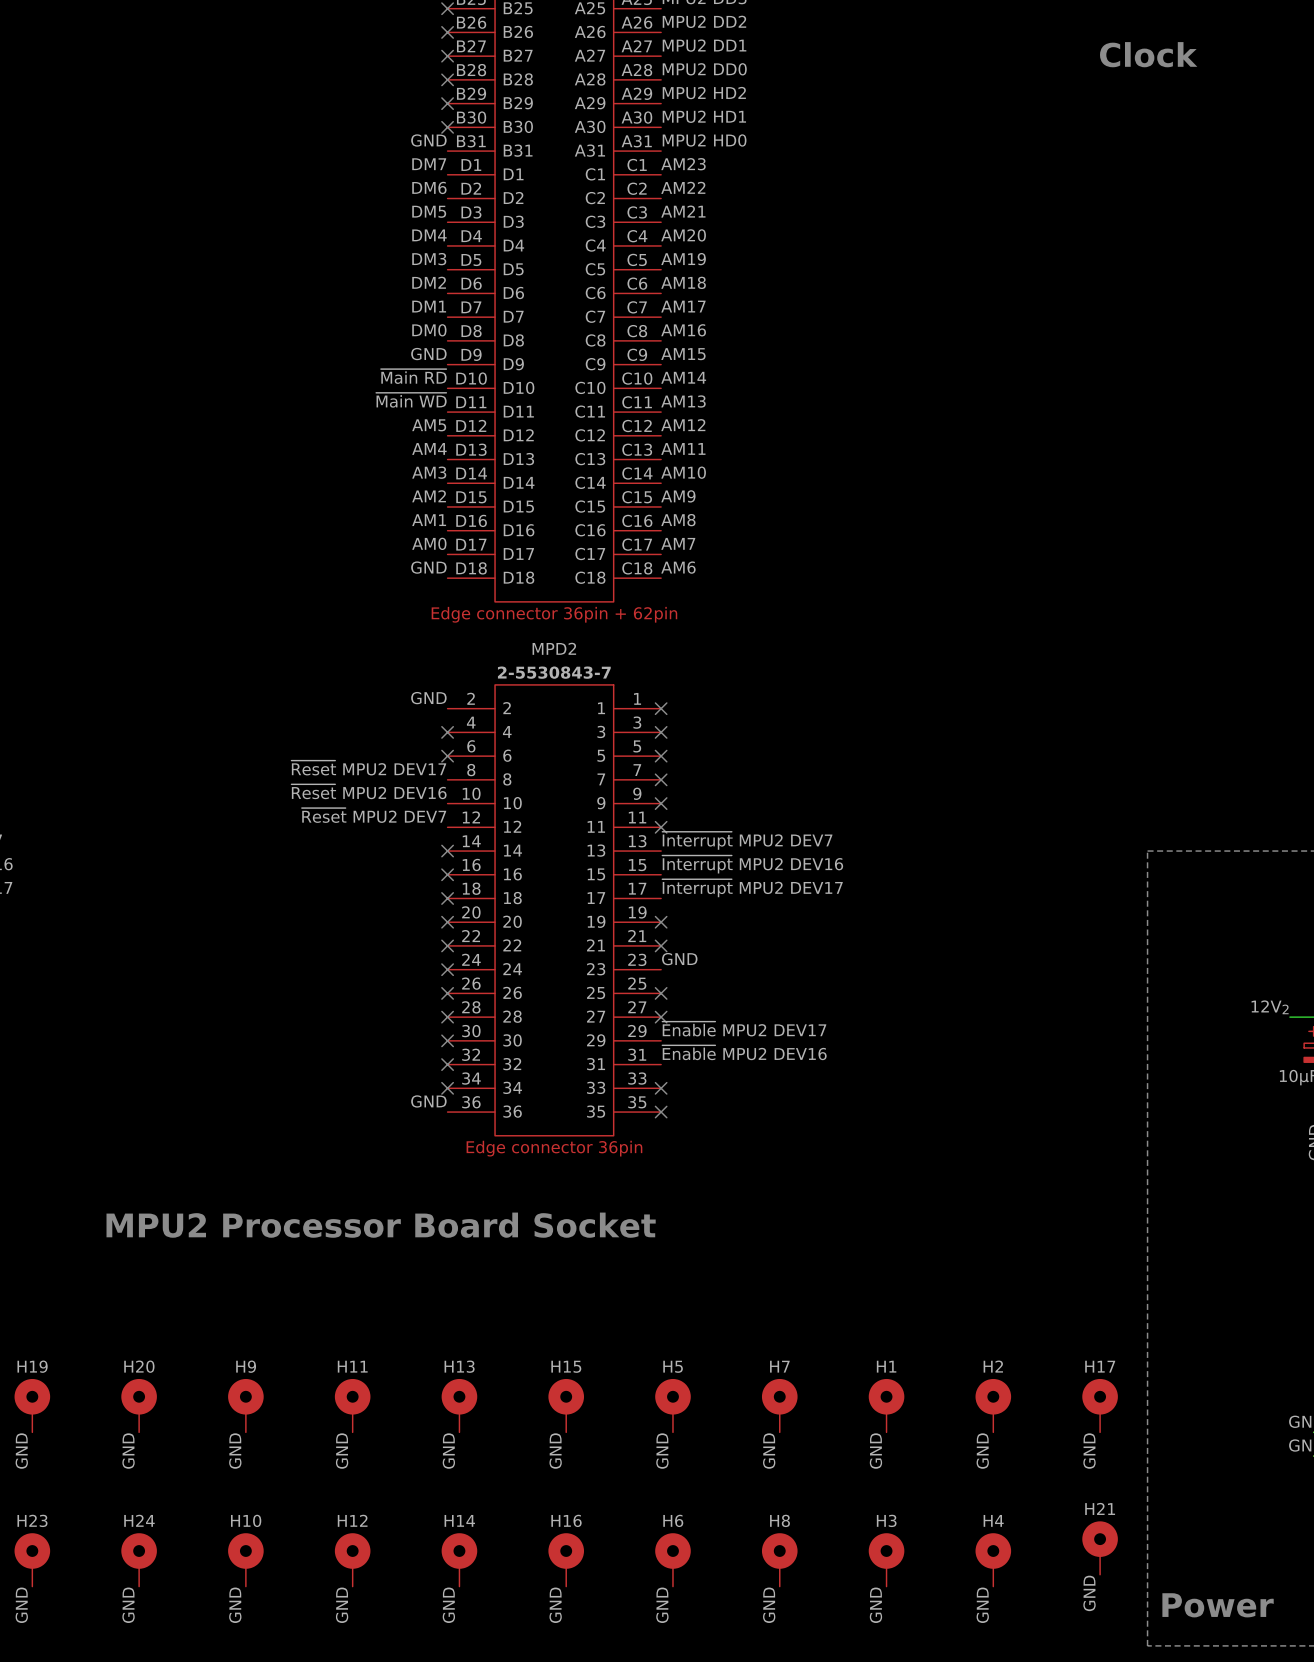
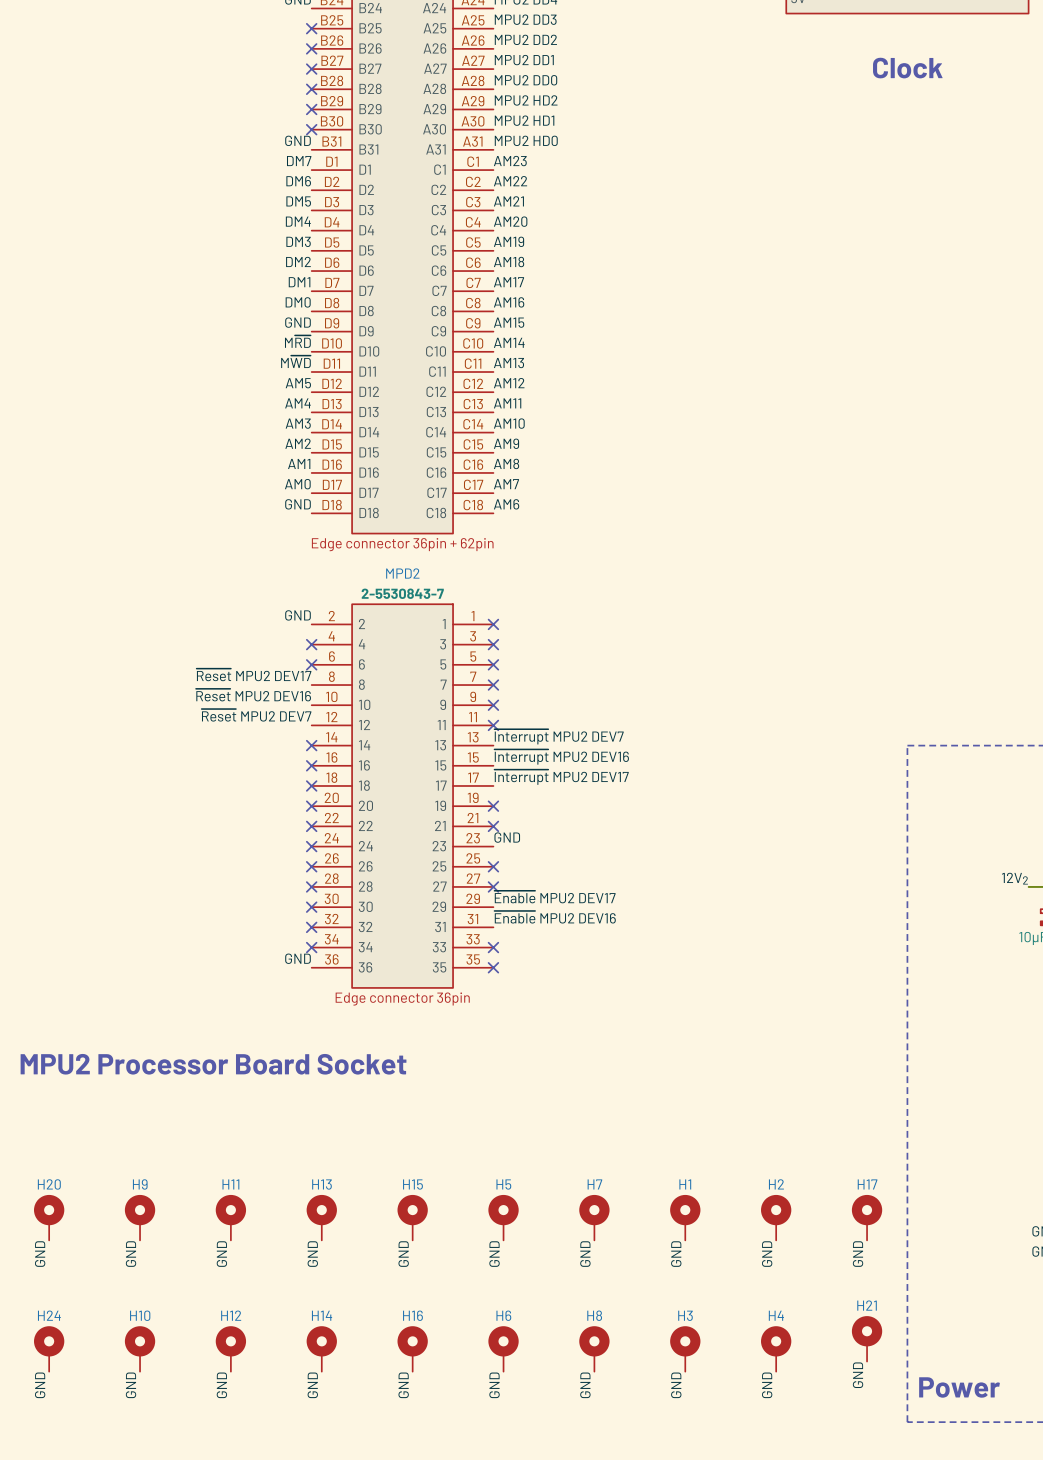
label: ~{Main RD} (413, 376) -> M~{RD} (297, 341)
label: ~{Main WD} (411, 400) -> M~{WD} (295, 361)

